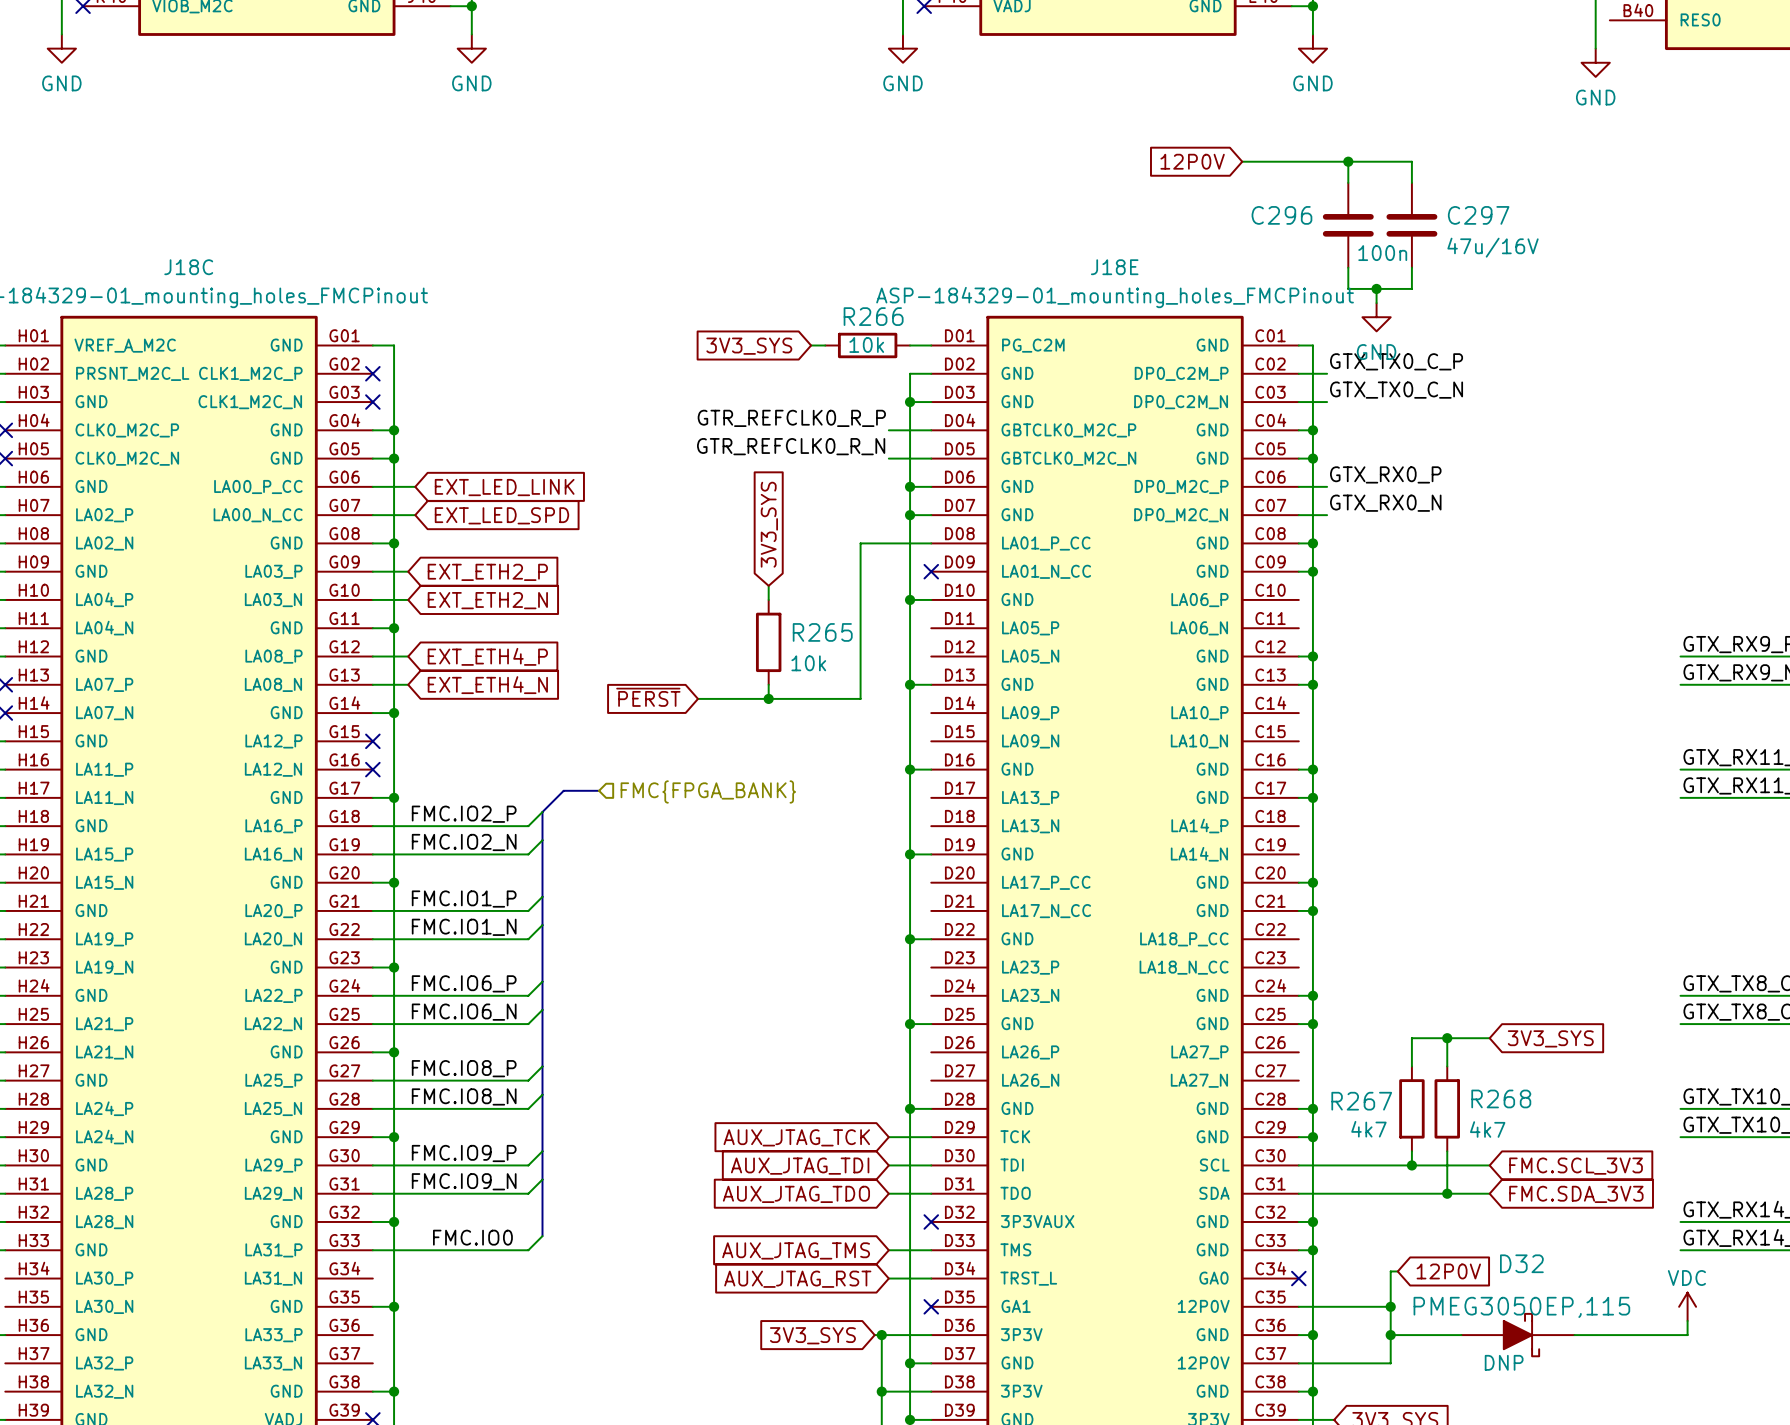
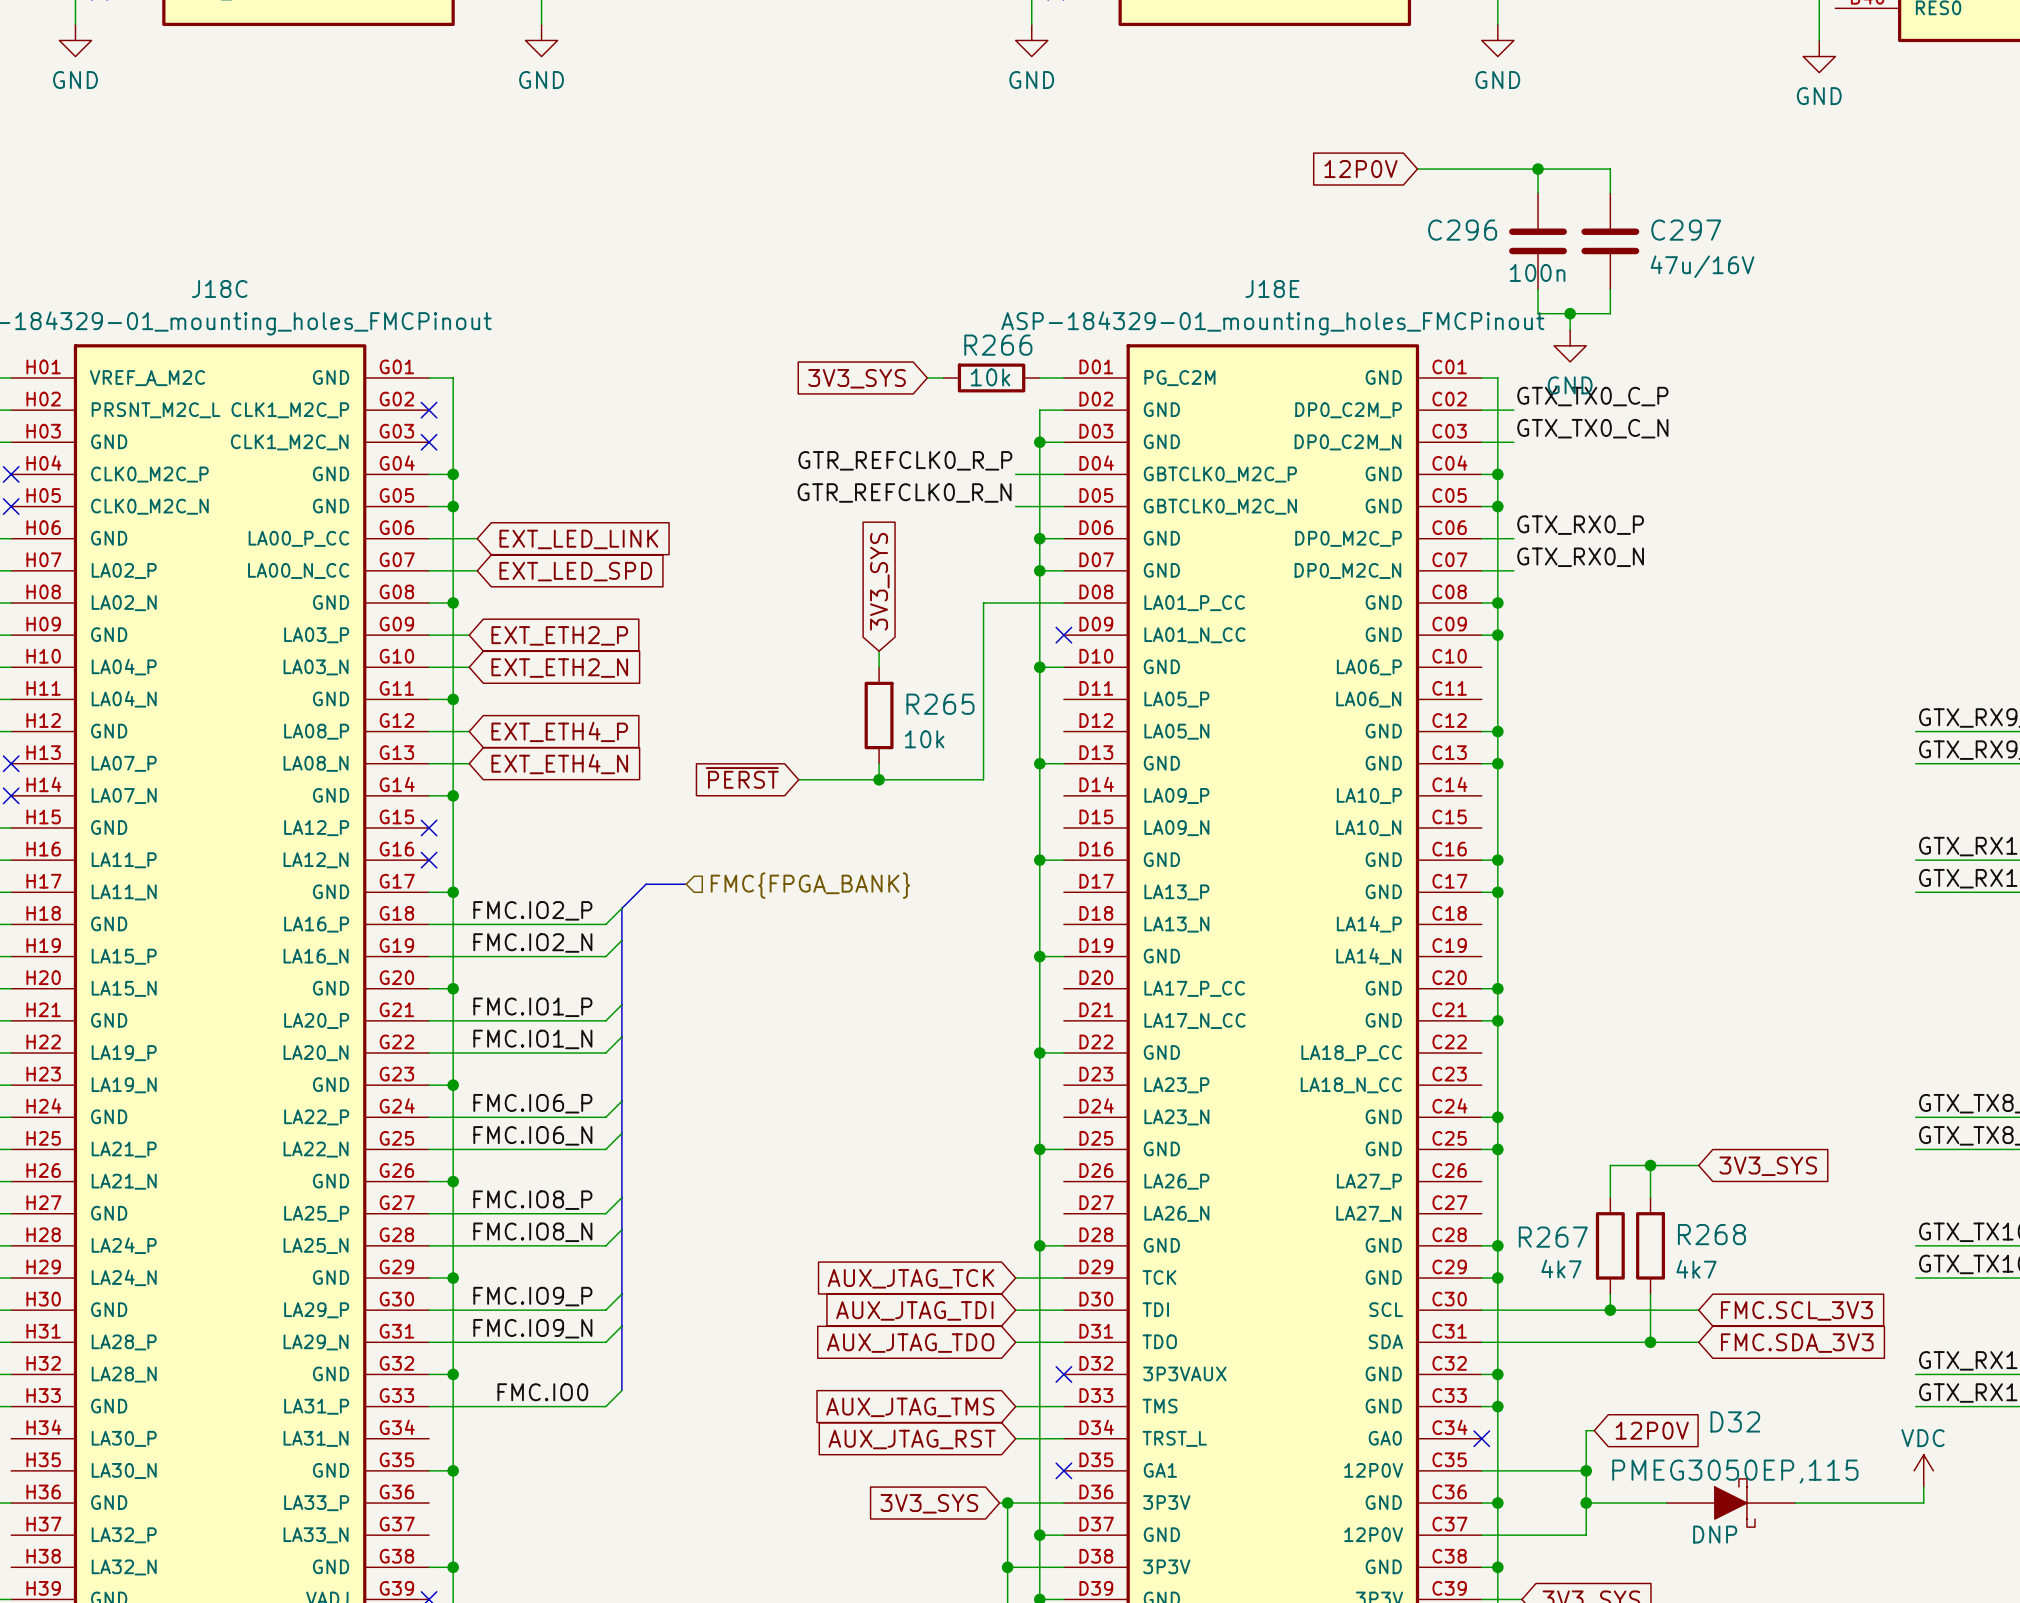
C296 text position: 100n (1382, 253) -> 100n (1537, 272)

